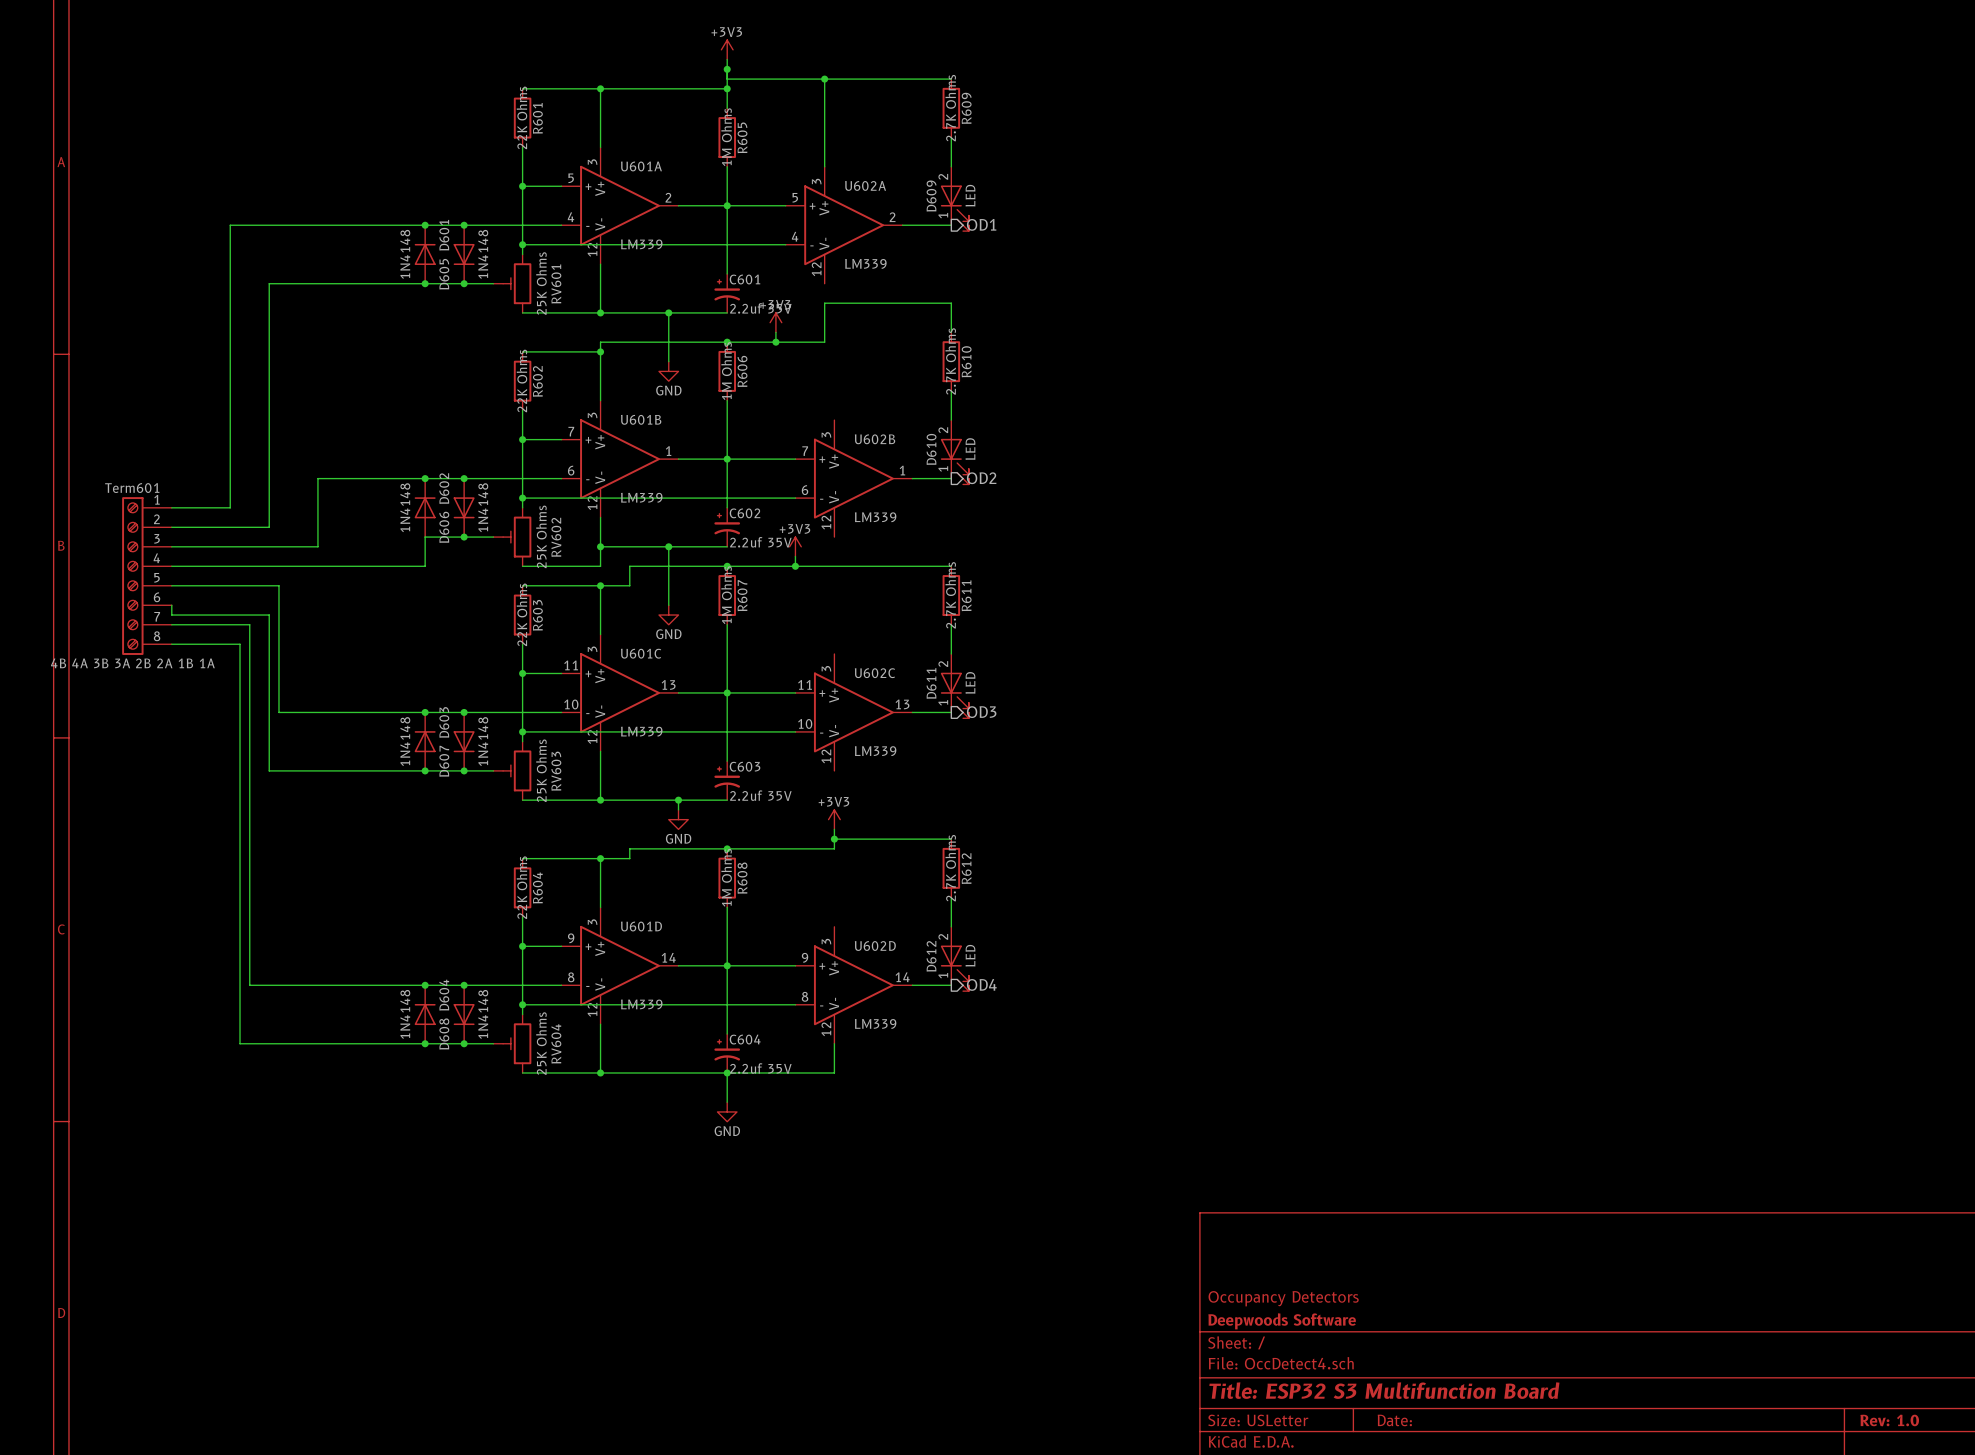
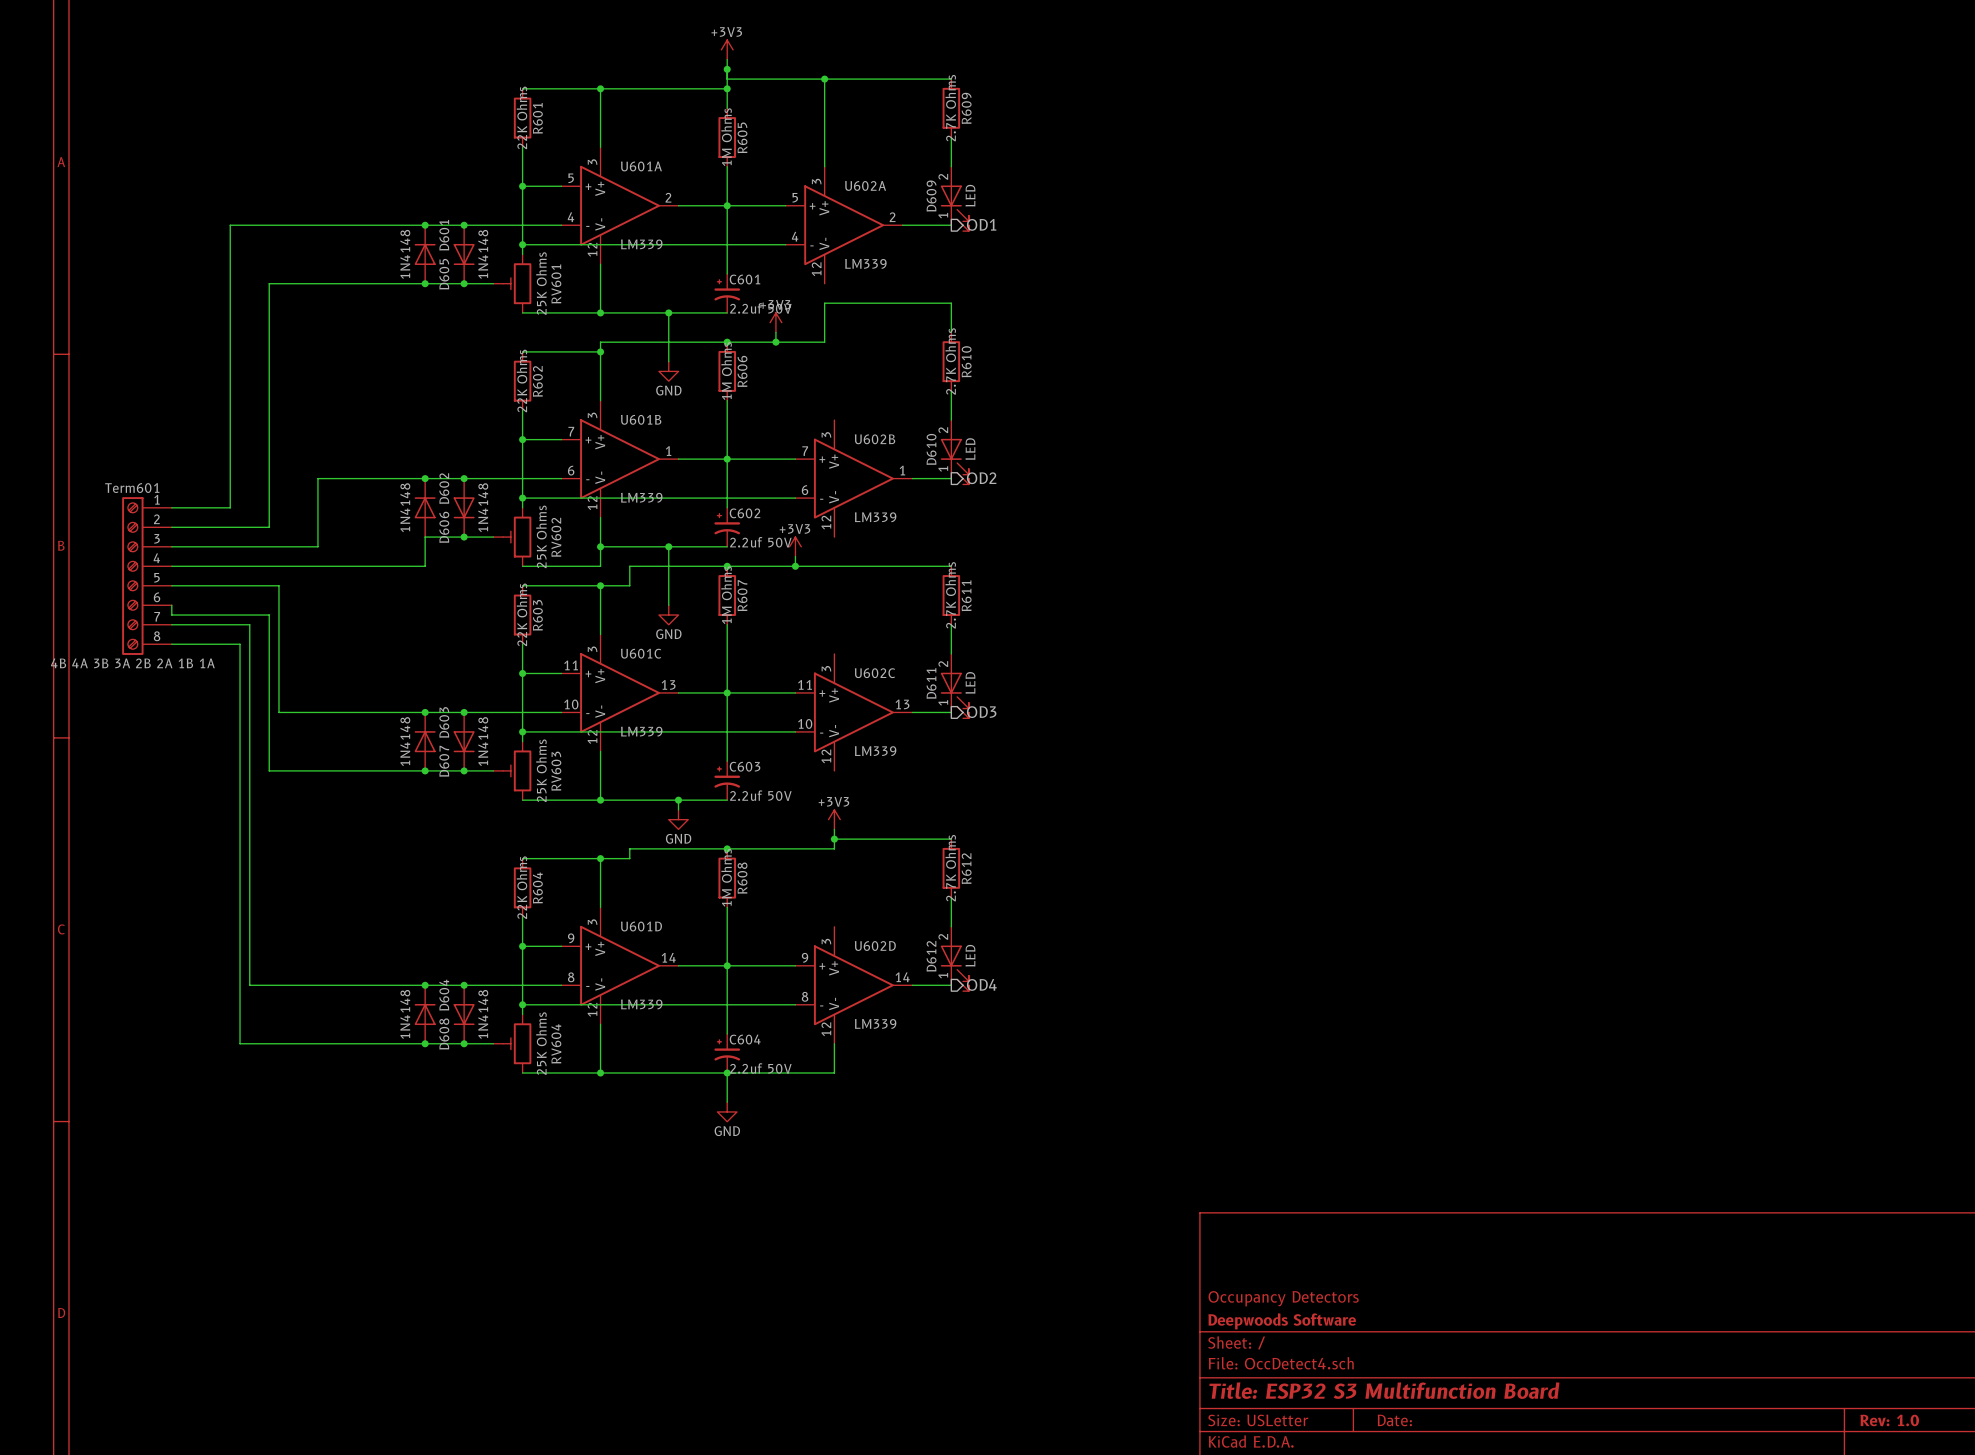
C601 value: 2.2uf 35V (760, 308) -> 2.2uf 50V (760, 308)
C602 value: 2.2uf 35V (760, 542) -> 2.2uf 50V (760, 542)
C603 value: 2.2uf 35V (760, 795) -> 2.2uf 50V (760, 795)
C604 value: 2.2uf 35V (760, 1068) -> 2.2uf 50V (760, 1068)

